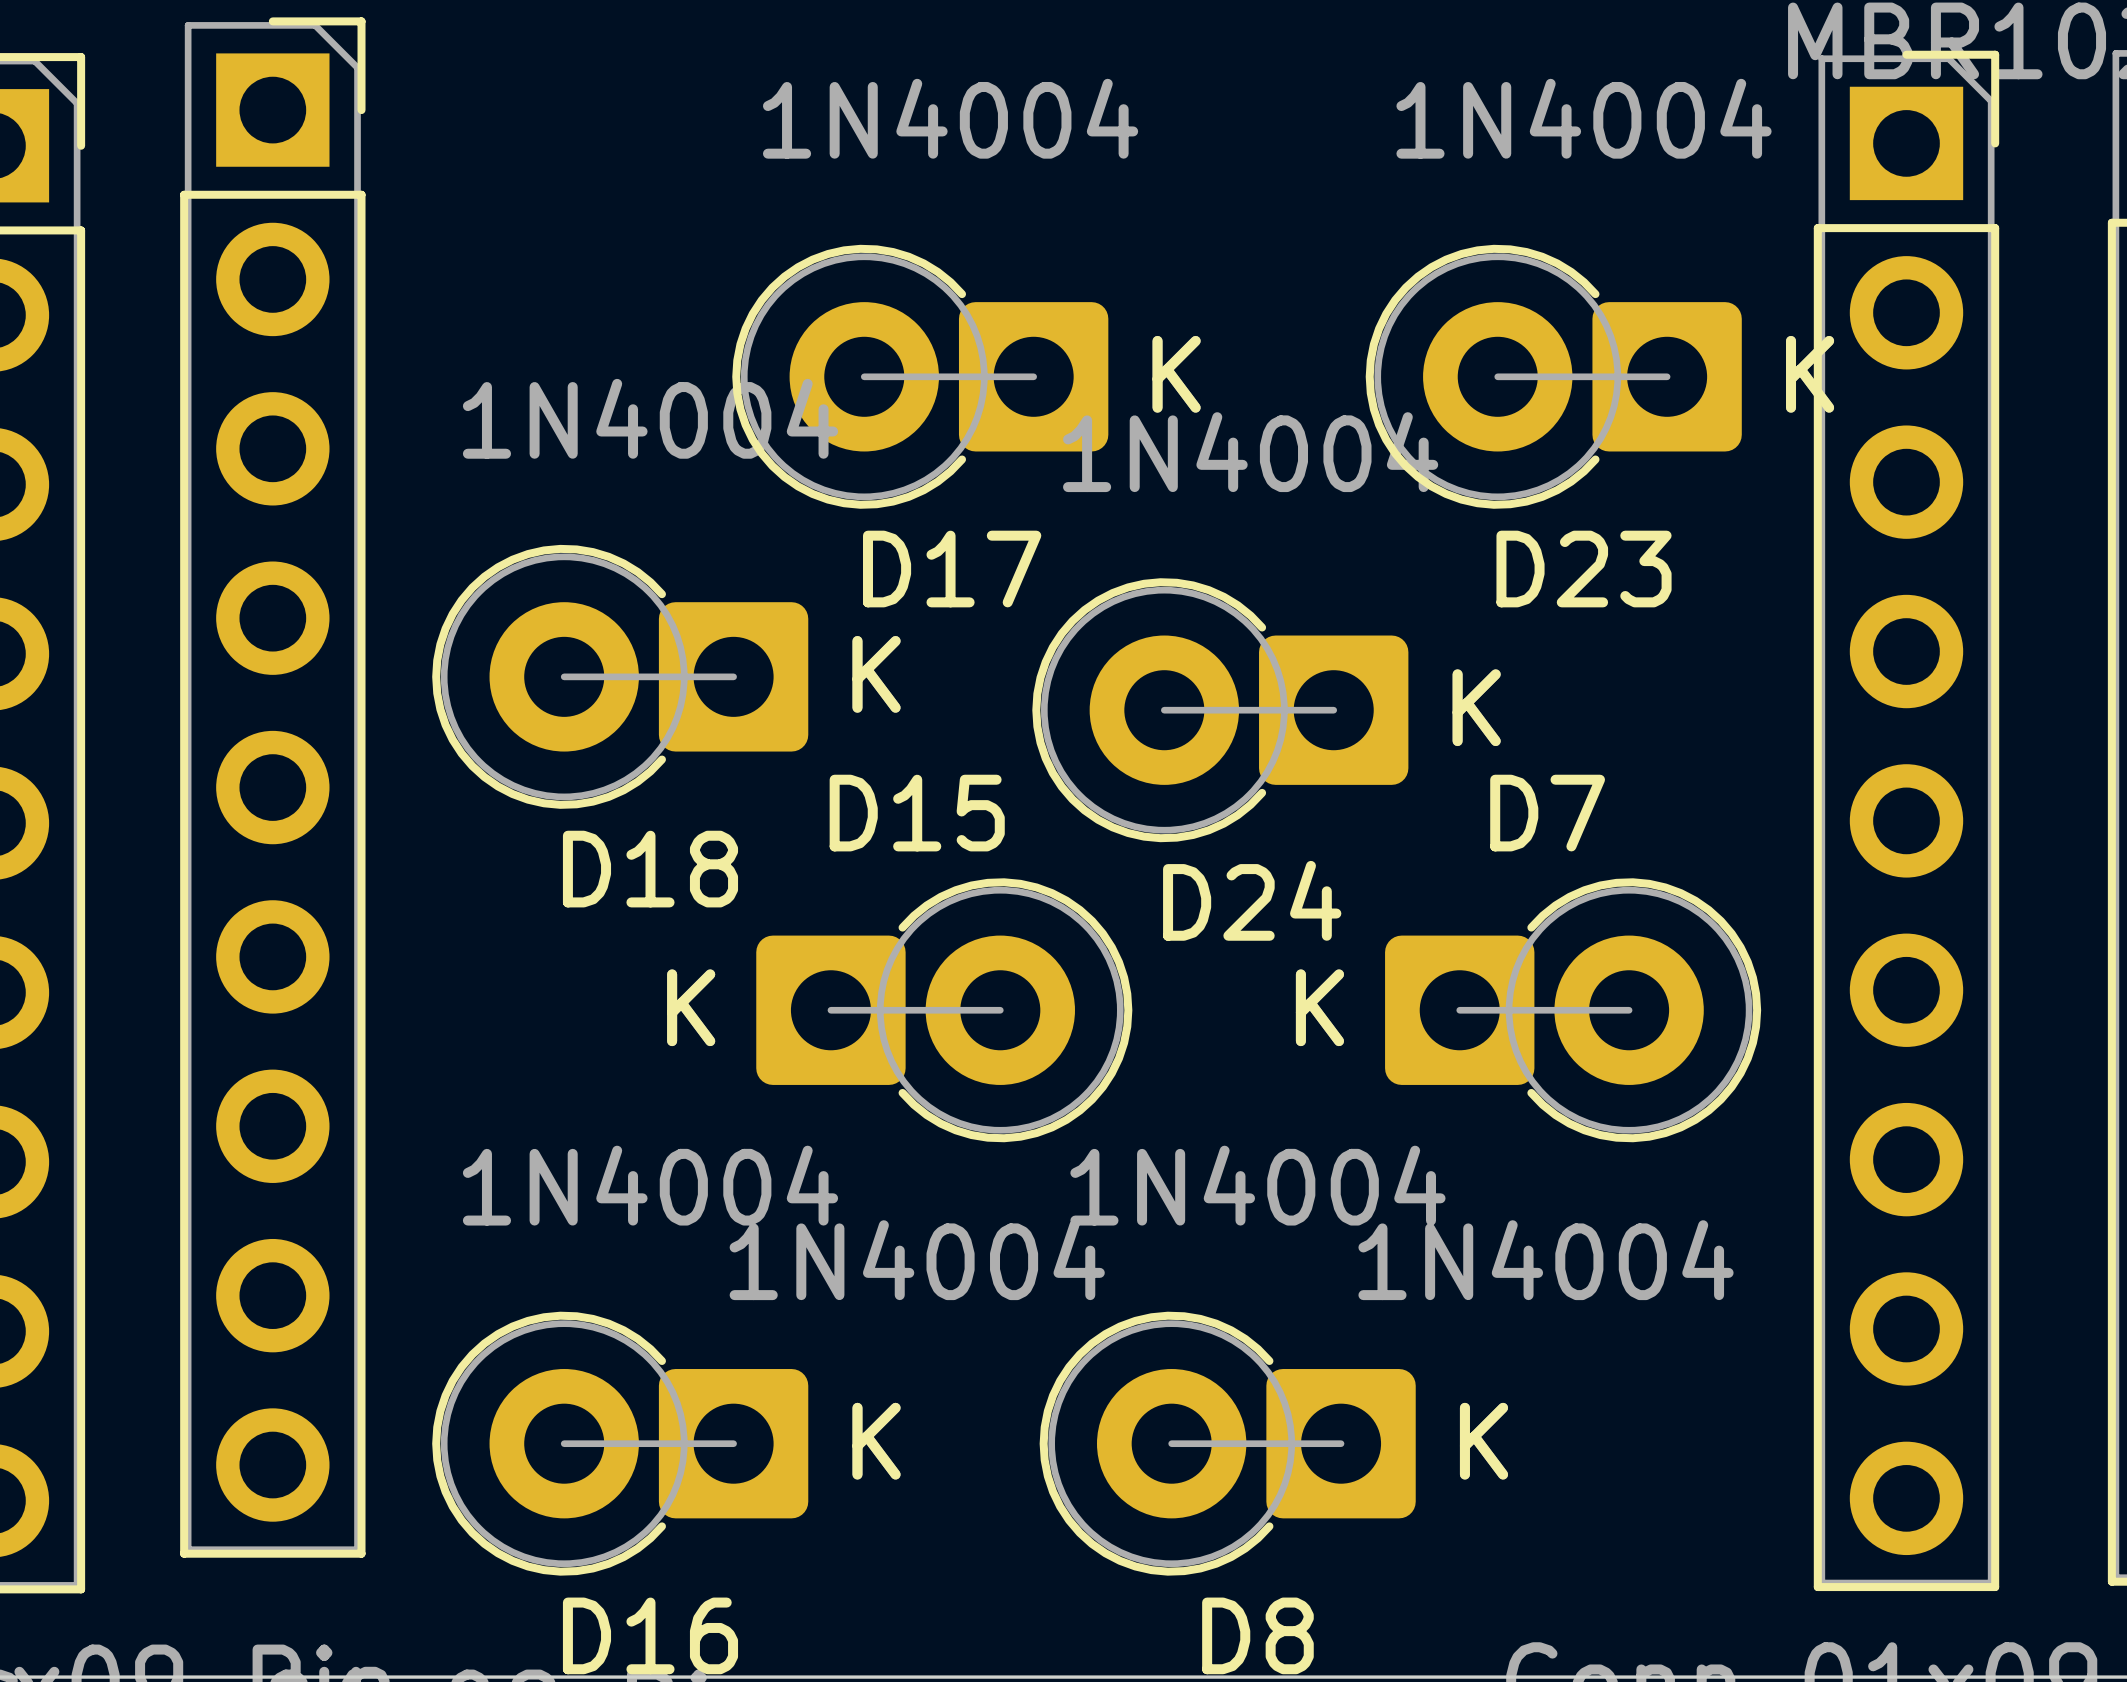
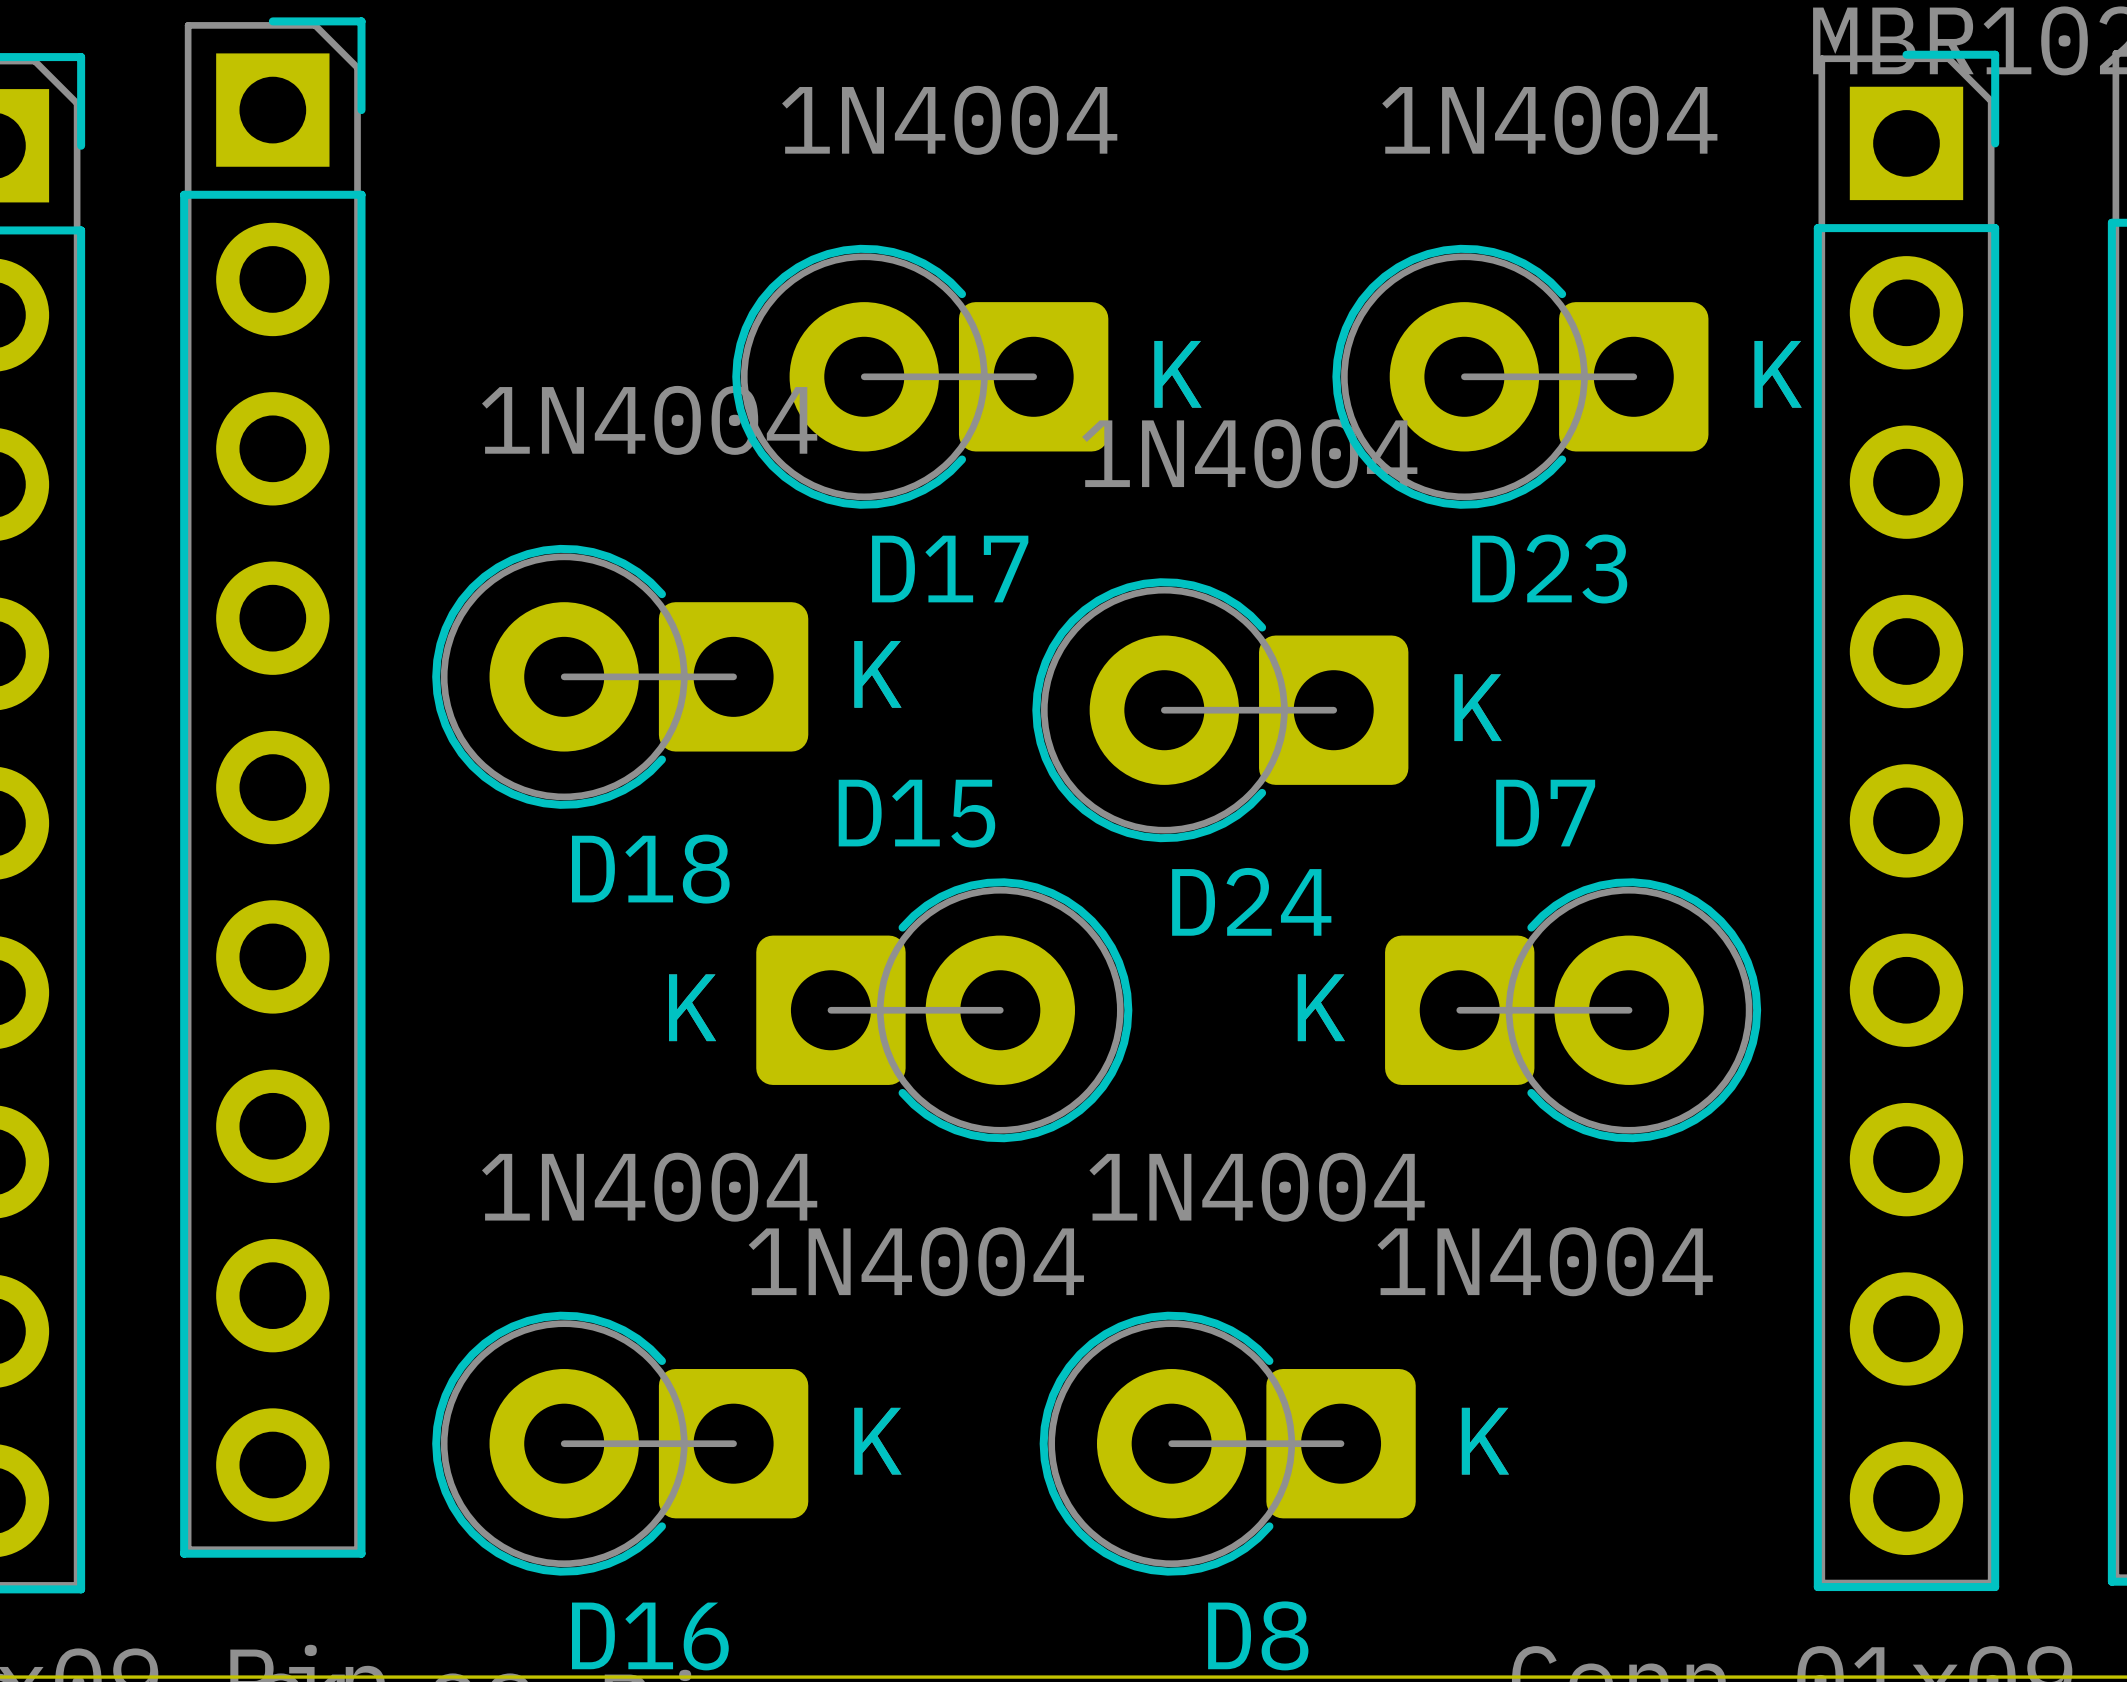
D23 position: (1553, 376) -> (1520, 376)

